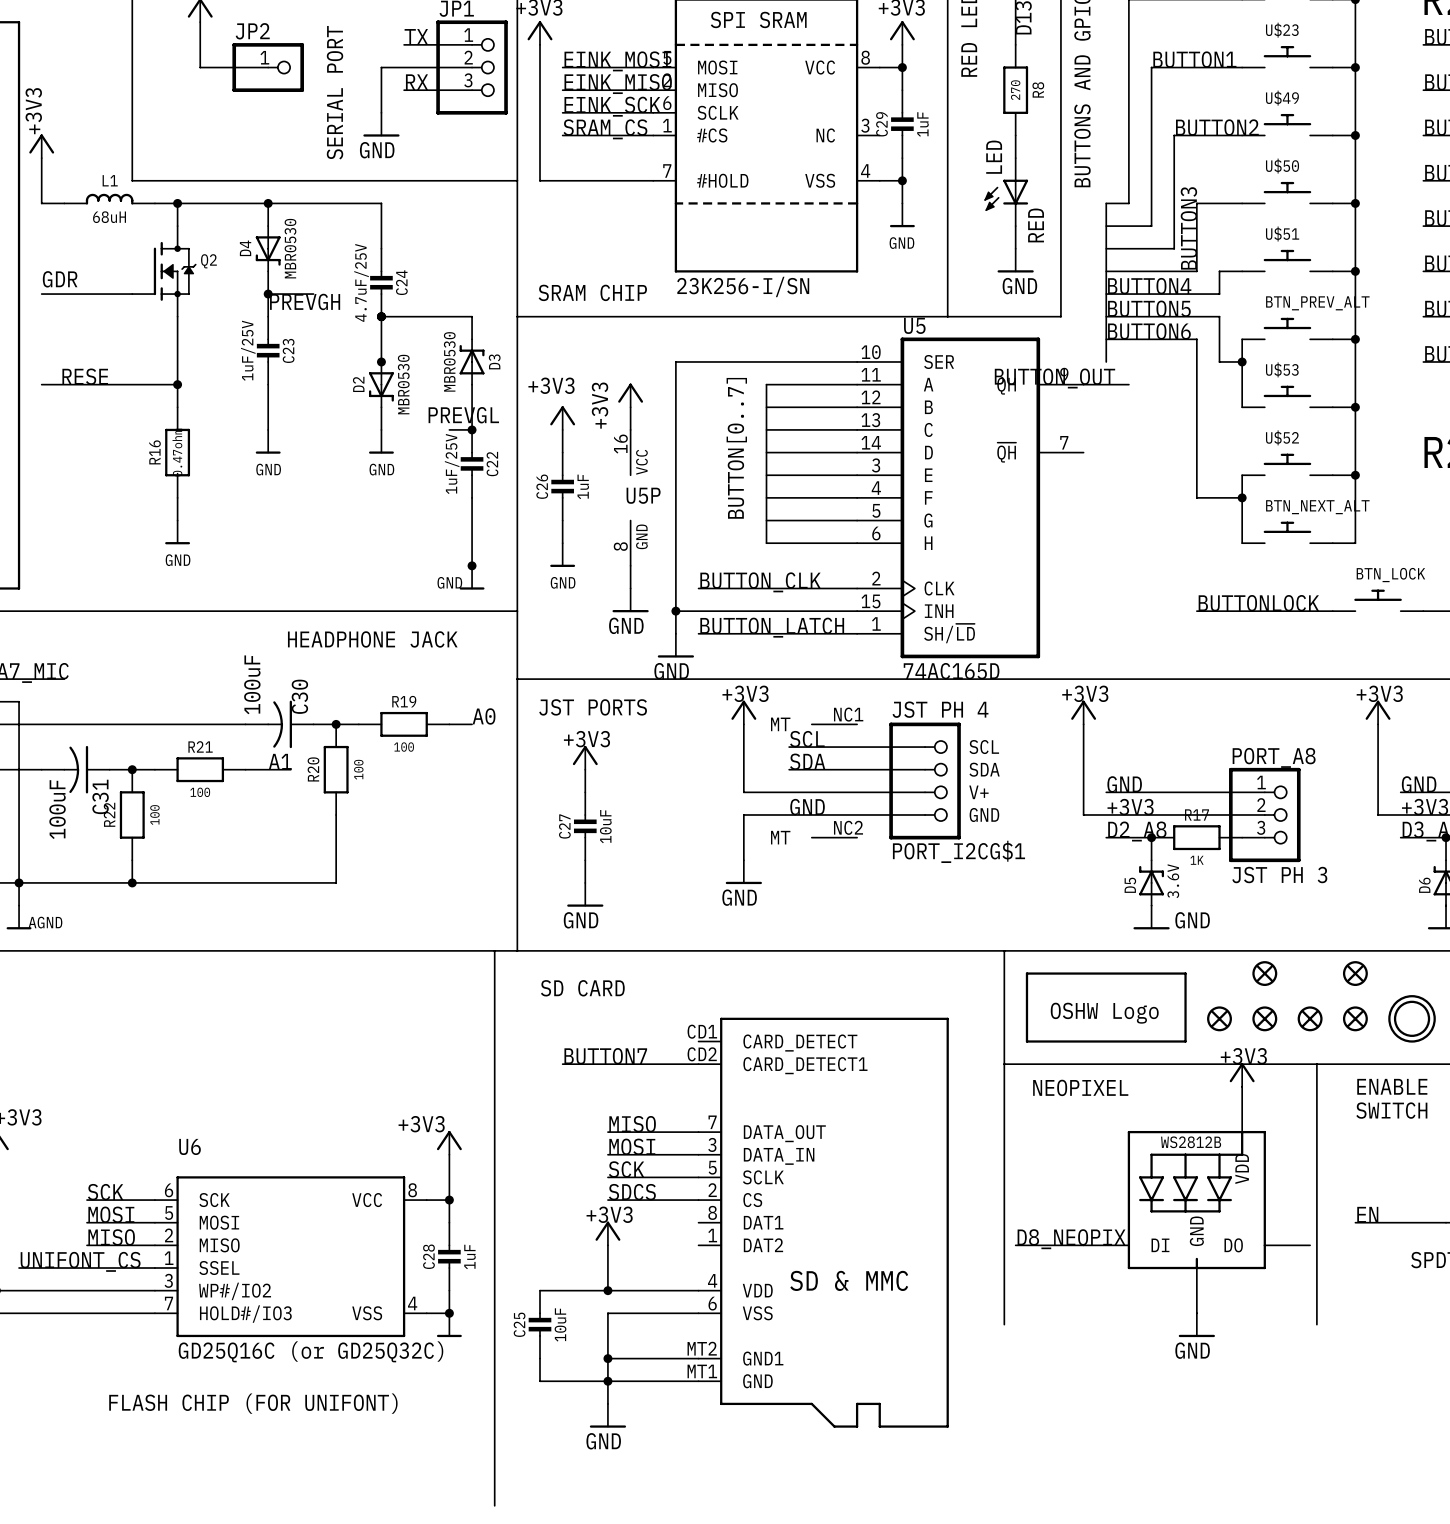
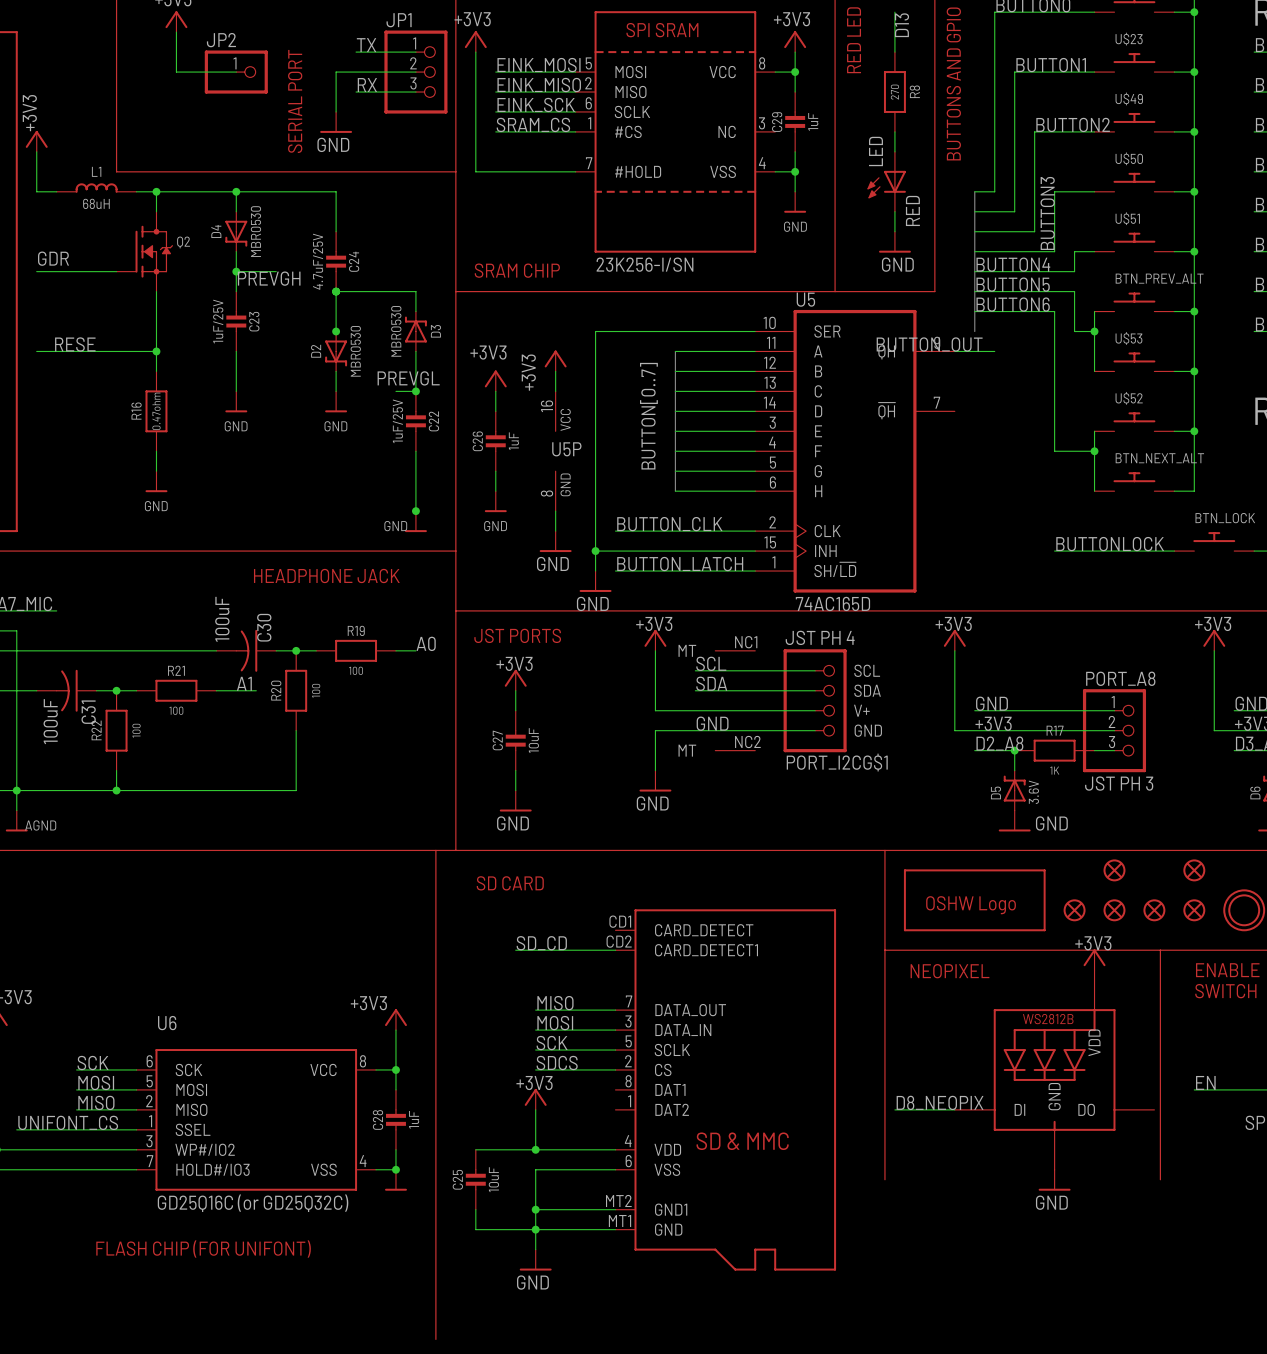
label: BUTTON7 (605, 1056) -> none
label: none -> SD_CD (541, 943)
wire: (562, 1064) (585, 1064) -> none

